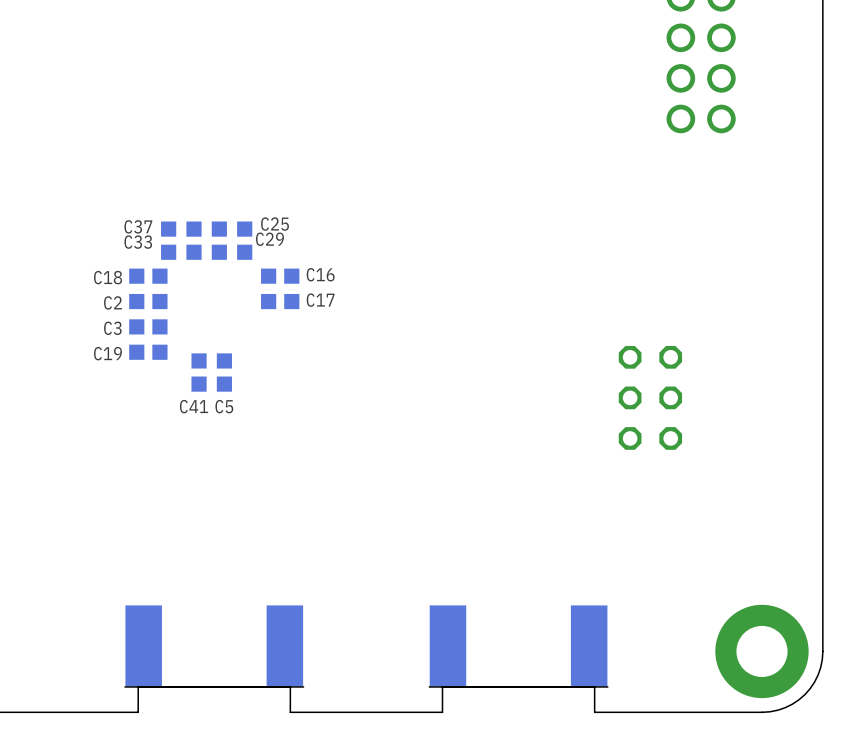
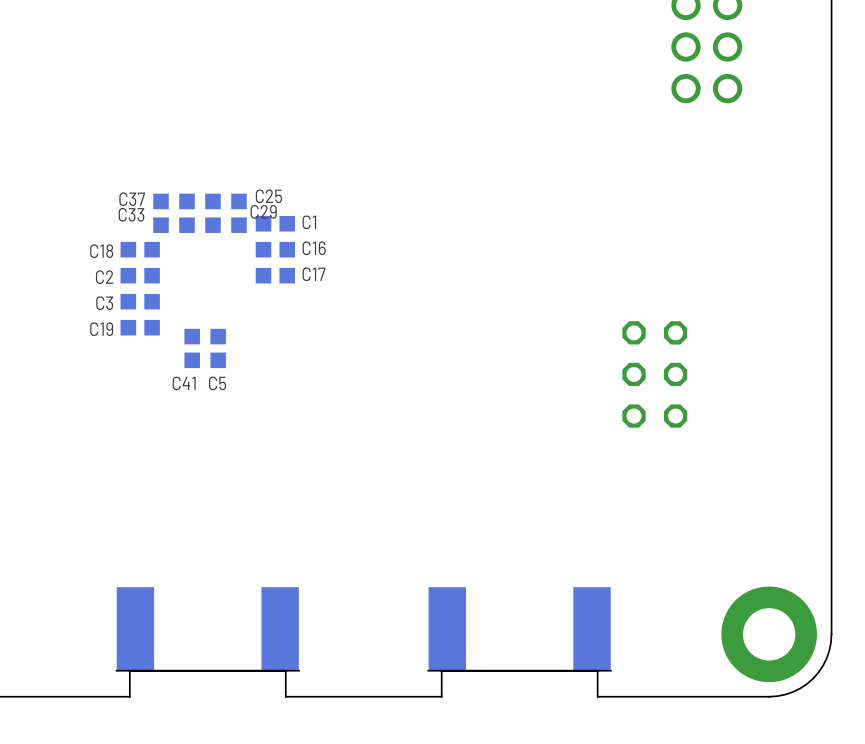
C1: none -> (275, 223)

